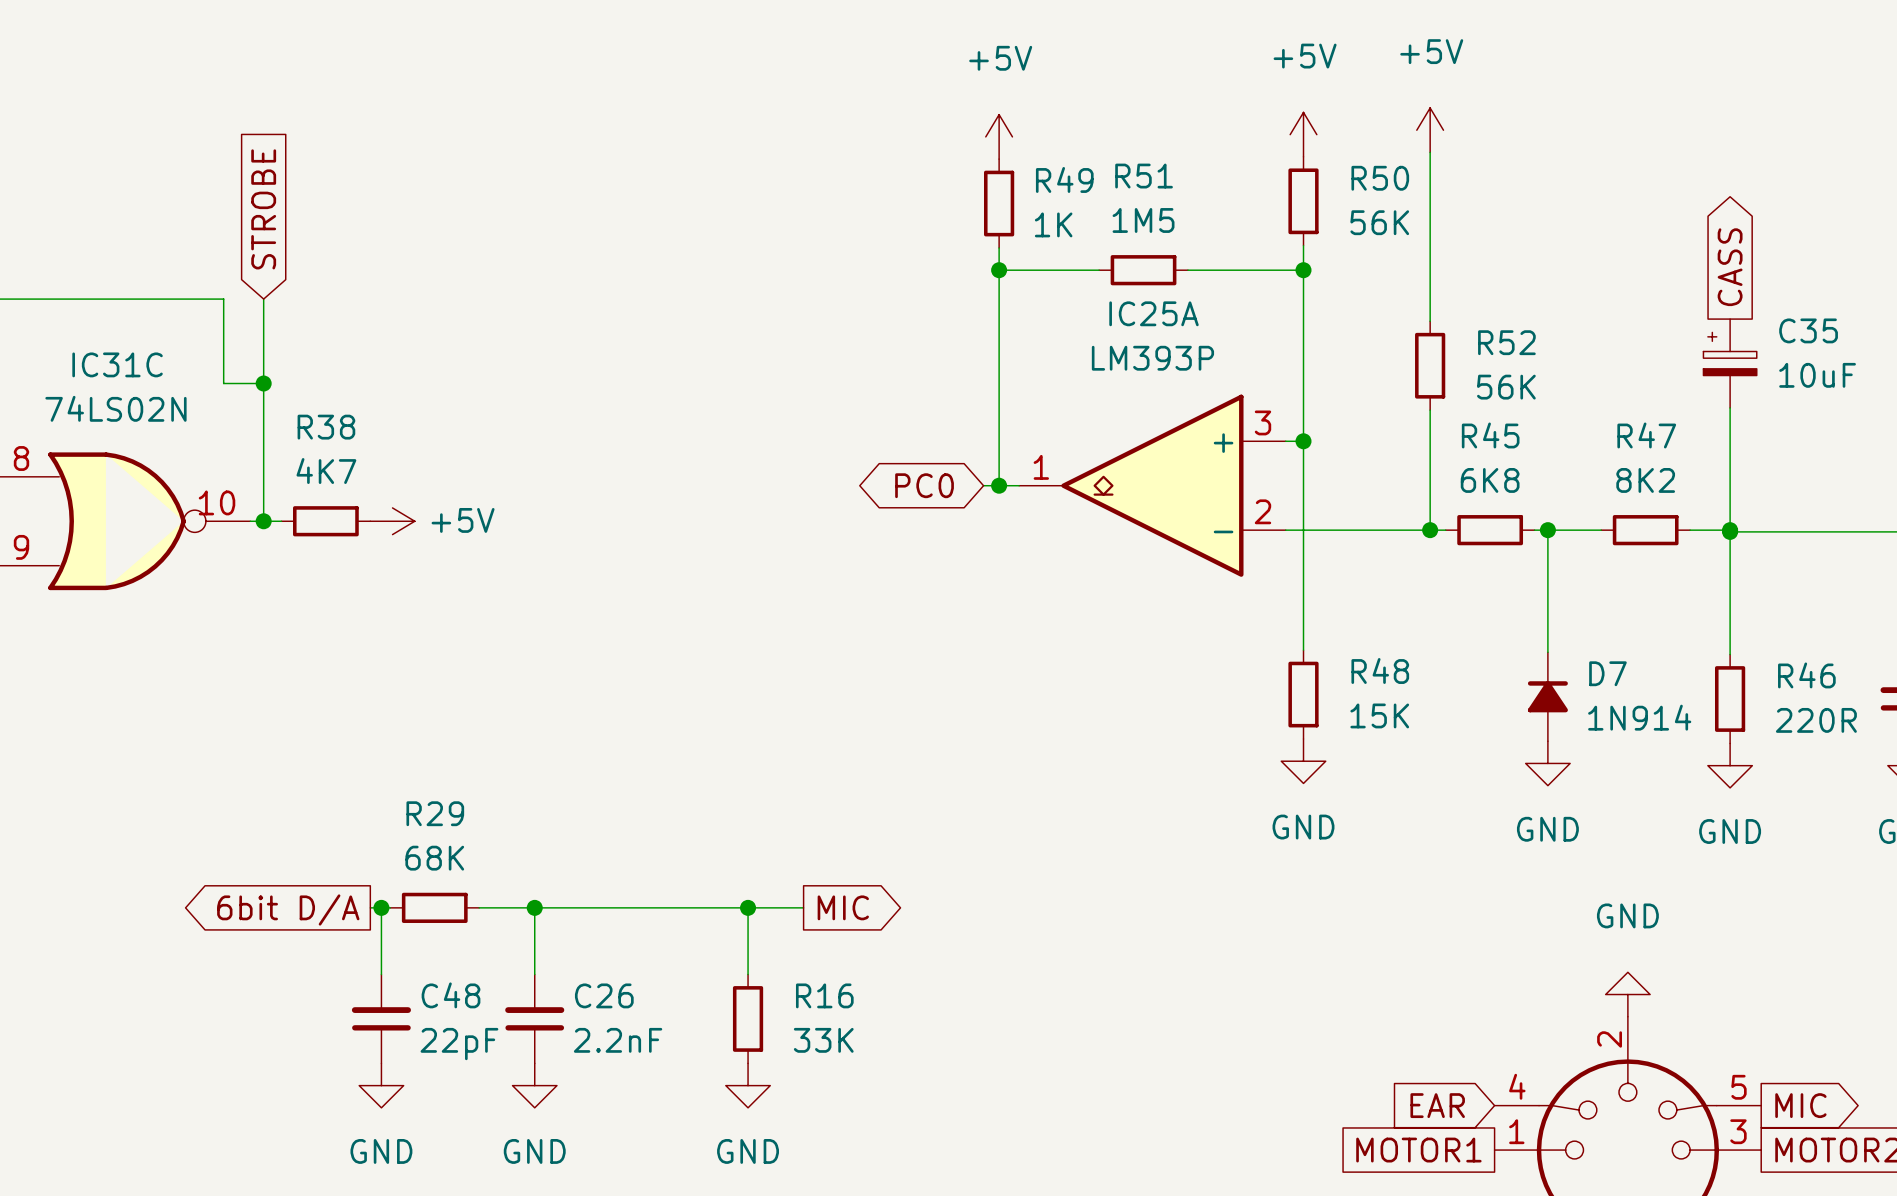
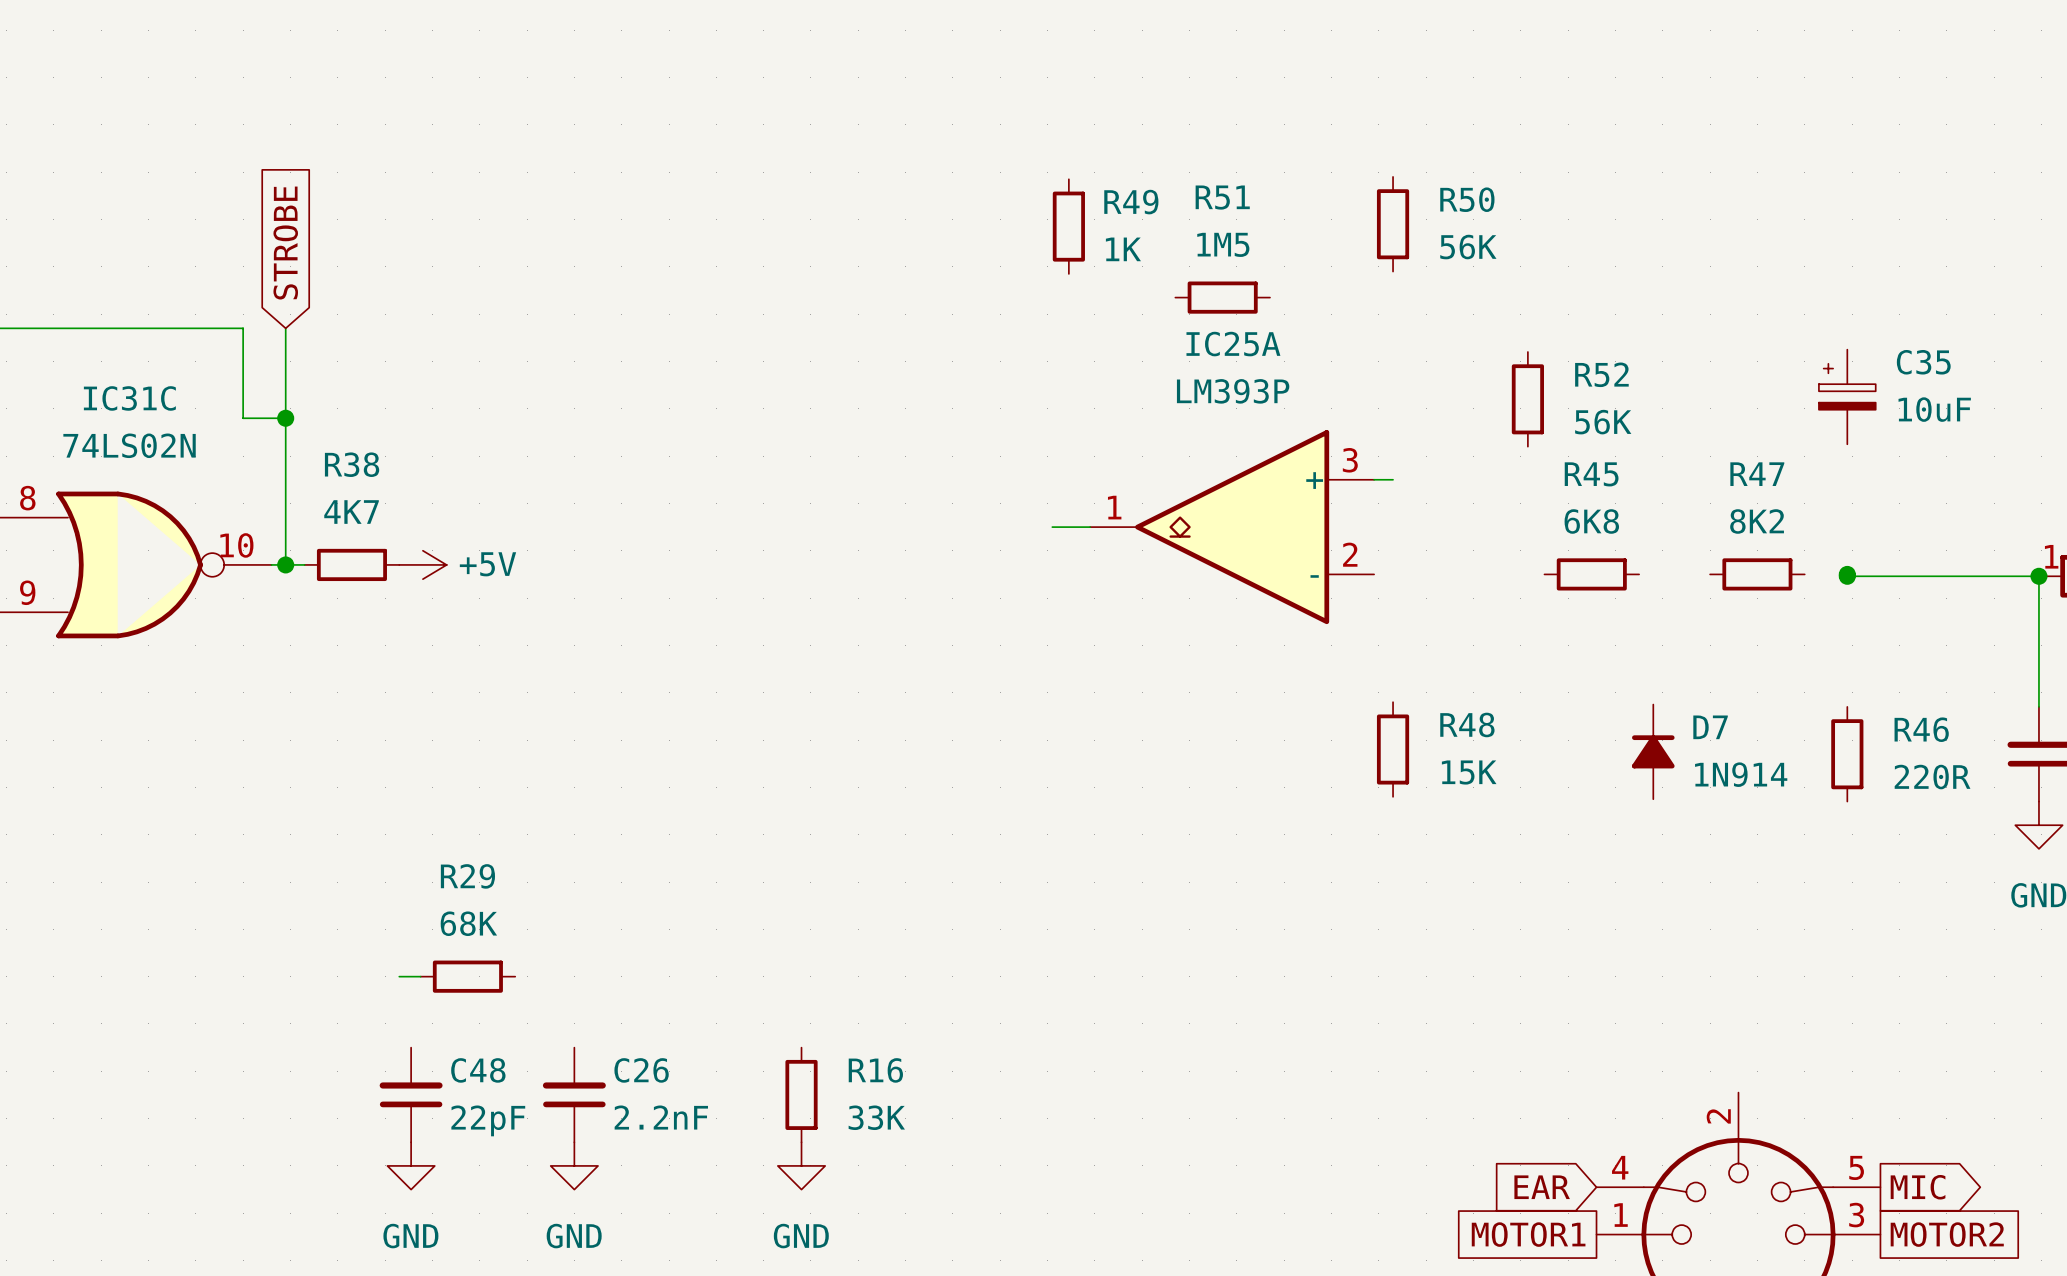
power symbol: +5V (1430, 130) -> none
power symbol: +5V (1303, 134) -> none
power symbol: +5V (999, 136) -> none
wire: (1430, 152) (1430, 321) -> none
wire: (1303, 245) (1303, 650) -> none
wire: (999, 247) (999, 485) -> none
global label: CASS (1730, 267) -> none
wire: (999, 270) (1099, 270) -> none
junction: (999, 270) -> none
wire: (1187, 270) (1303, 270) -> none
junction: (1303, 270) -> none
wire: (1730, 407) (1730, 654) -> none
wire: (1430, 410) (1430, 530) -> none
junction: (1303, 441) -> none
global label: PC0 (924, 485) -> none
junction: (999, 485) -> none
wire: (1285, 530) (1445, 530) -> none
junction: (1430, 530) -> none
wire: (1534, 530) (1601, 530) -> none
wire: (1547, 530) (1547, 652) -> none
junction: (1547, 530) -> none
wire: (1690, 530) (1730, 530) -> none
power symbol: GND (1303, 761) -> none
power symbol: GND (1547, 763) -> none
power symbol: GND (1730, 765) -> none
wire: (381, 907) (381, 974) -> none
junction: (381, 907) -> none
wire: (479, 907) (803, 907) -> none
wire: (534, 907) (534, 974) -> none
junction: (534, 907) -> none
wire: (748, 907) (748, 974) -> none
junction: (748, 907) -> none
global label: MIC (843, 907) -> none
global label: 6bit D/A (288, 909) -> none
power symbol: GND (1627, 994) -> none

